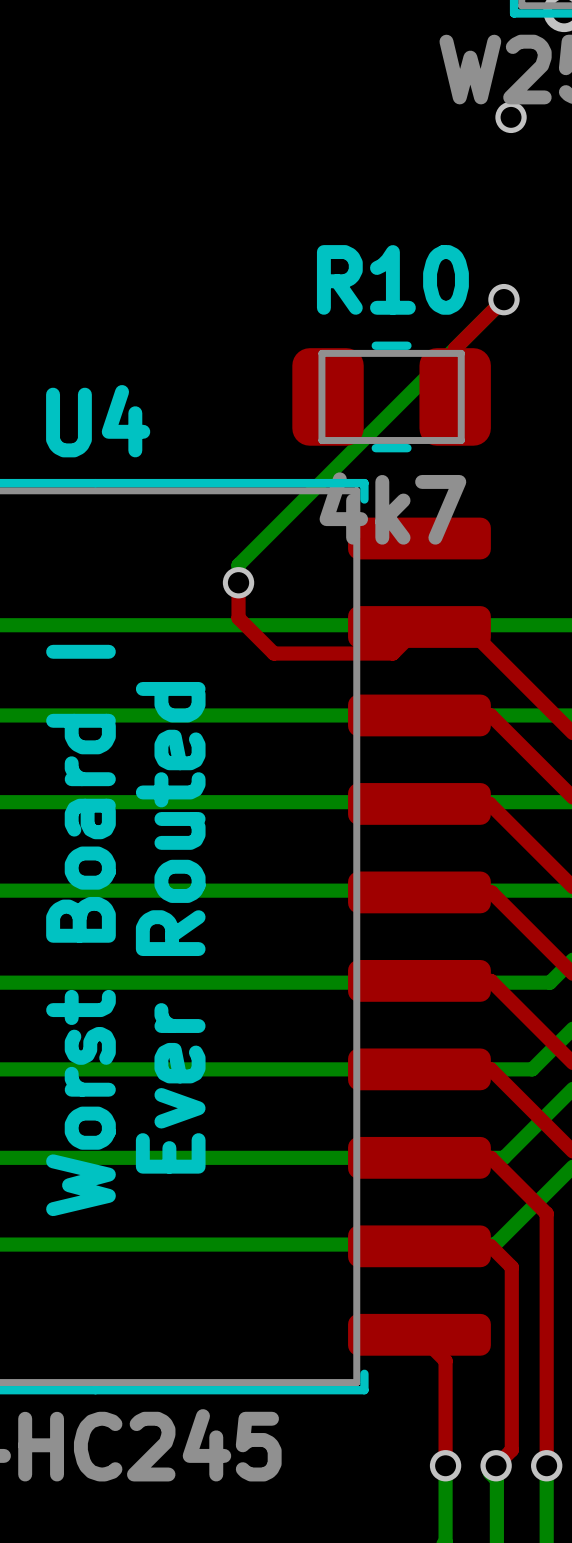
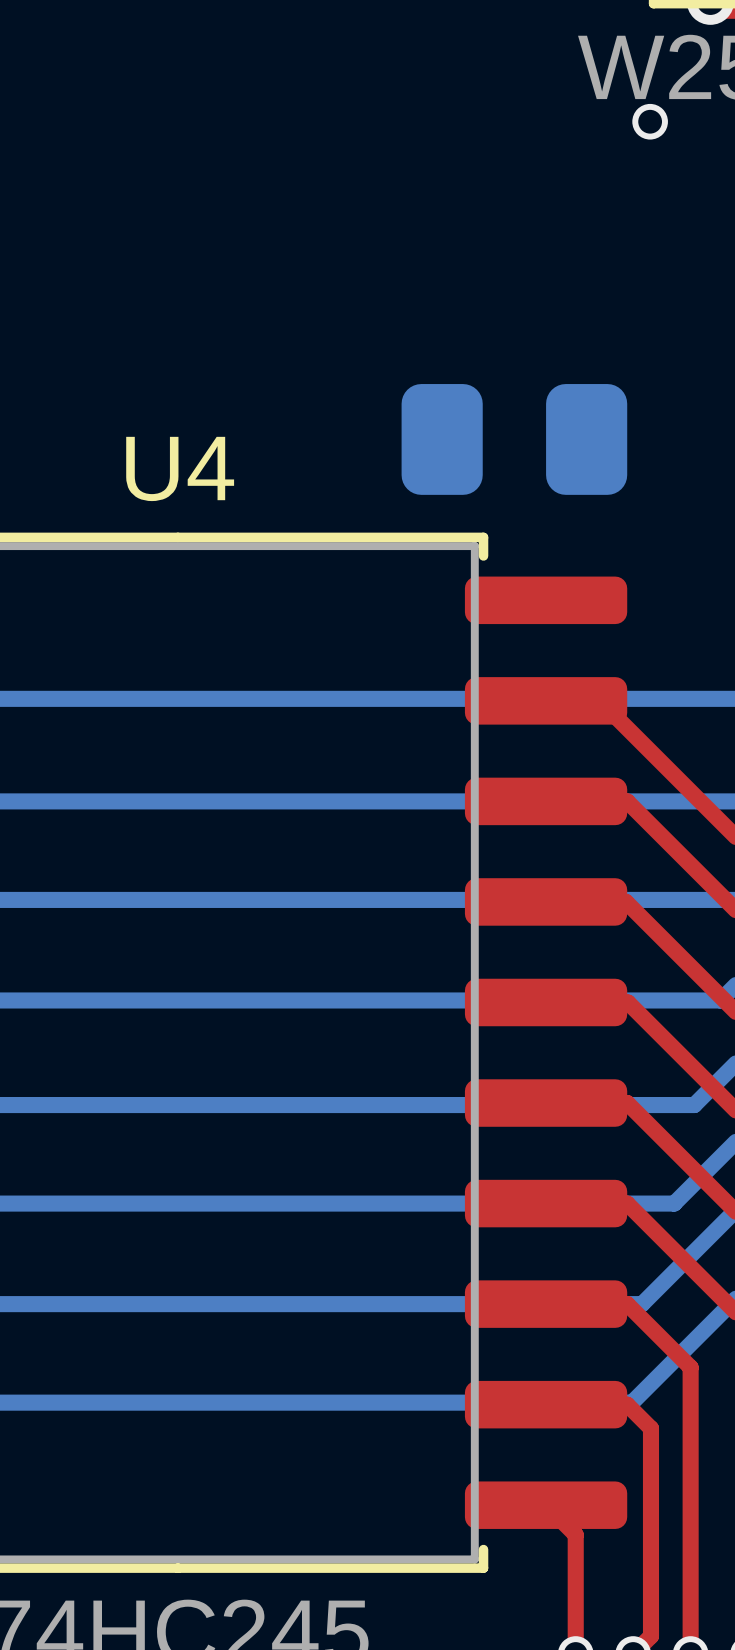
bottom track: (503, 299) (238, 565) (238, 582) -> none
top track: (503, 299) (455, 348) (455, 396) -> none
via: (503, 299) -> none
R10 side: top (391, 396) -> bottom (514, 439)
top track: (238, 582) (238, 618) (273, 653) (392, 653) (419, 626) -> none
via: (238, 582) -> none
text: Ever Routed (170, 927) -> none
text: Worst Board I (80, 930) -> none

